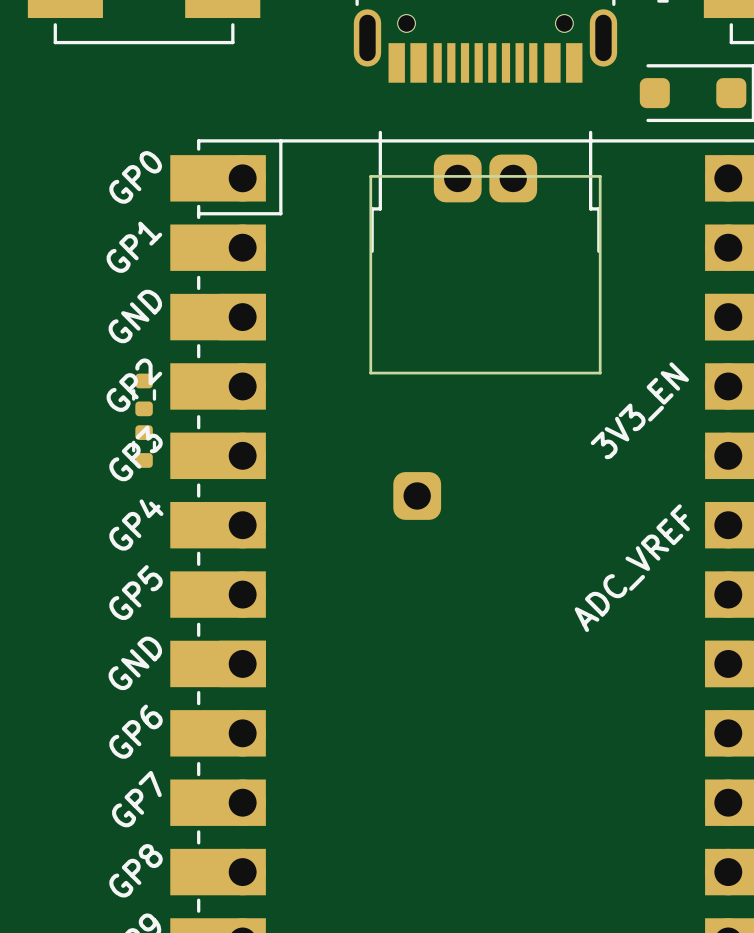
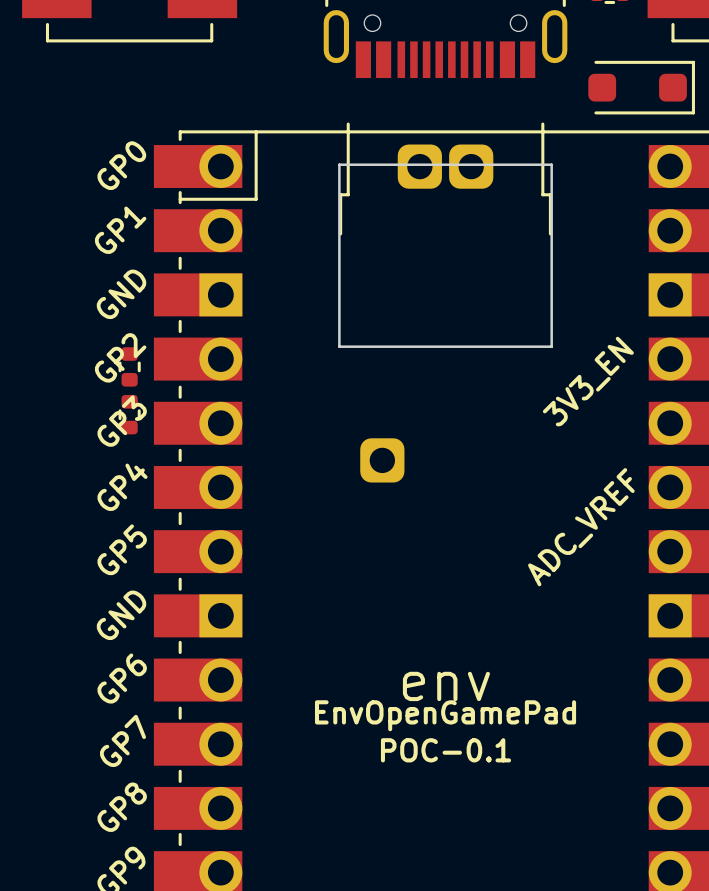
text: none -> env (446, 686)
text: none -> EnvOpenGamePad (445, 715)
text: none -> POC-0.1 (446, 750)

